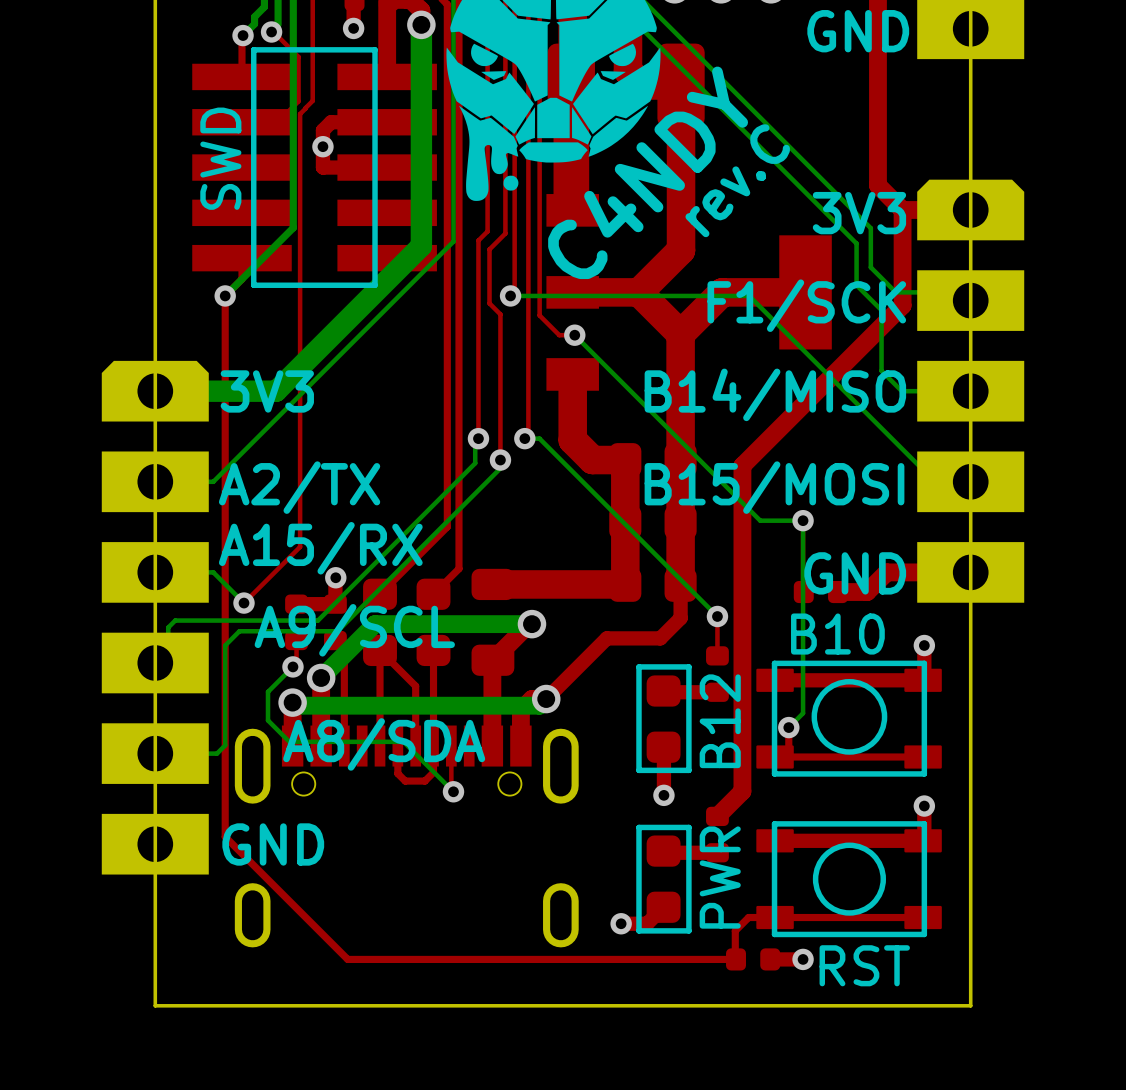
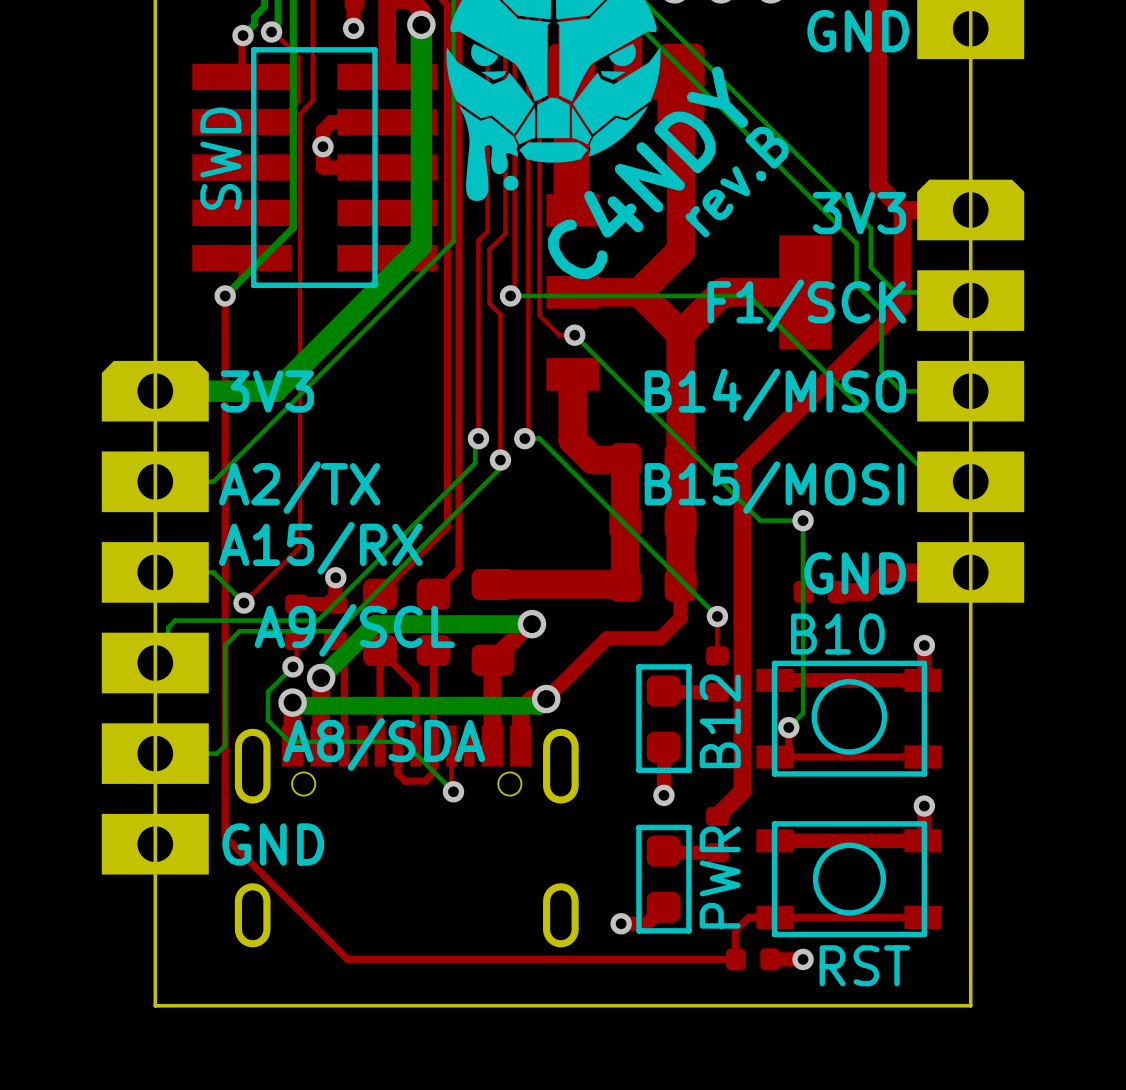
text: rev.C (737, 180) -> rev.B (737, 181)

